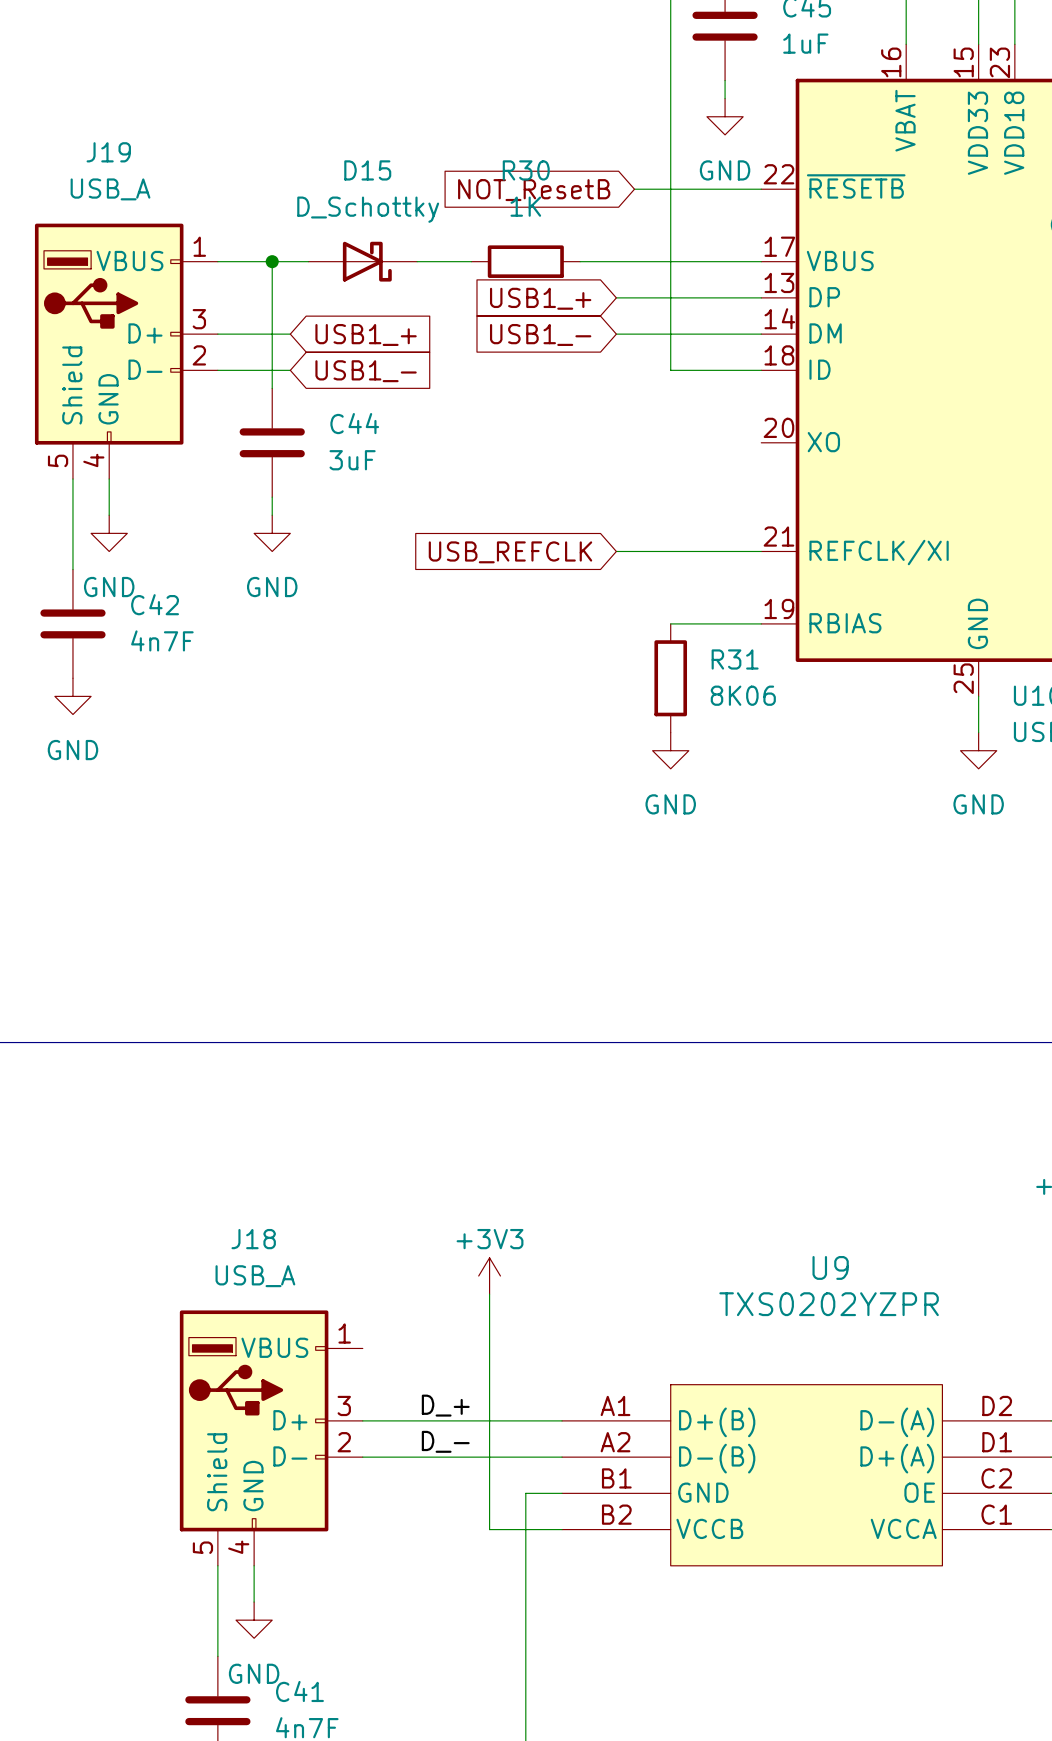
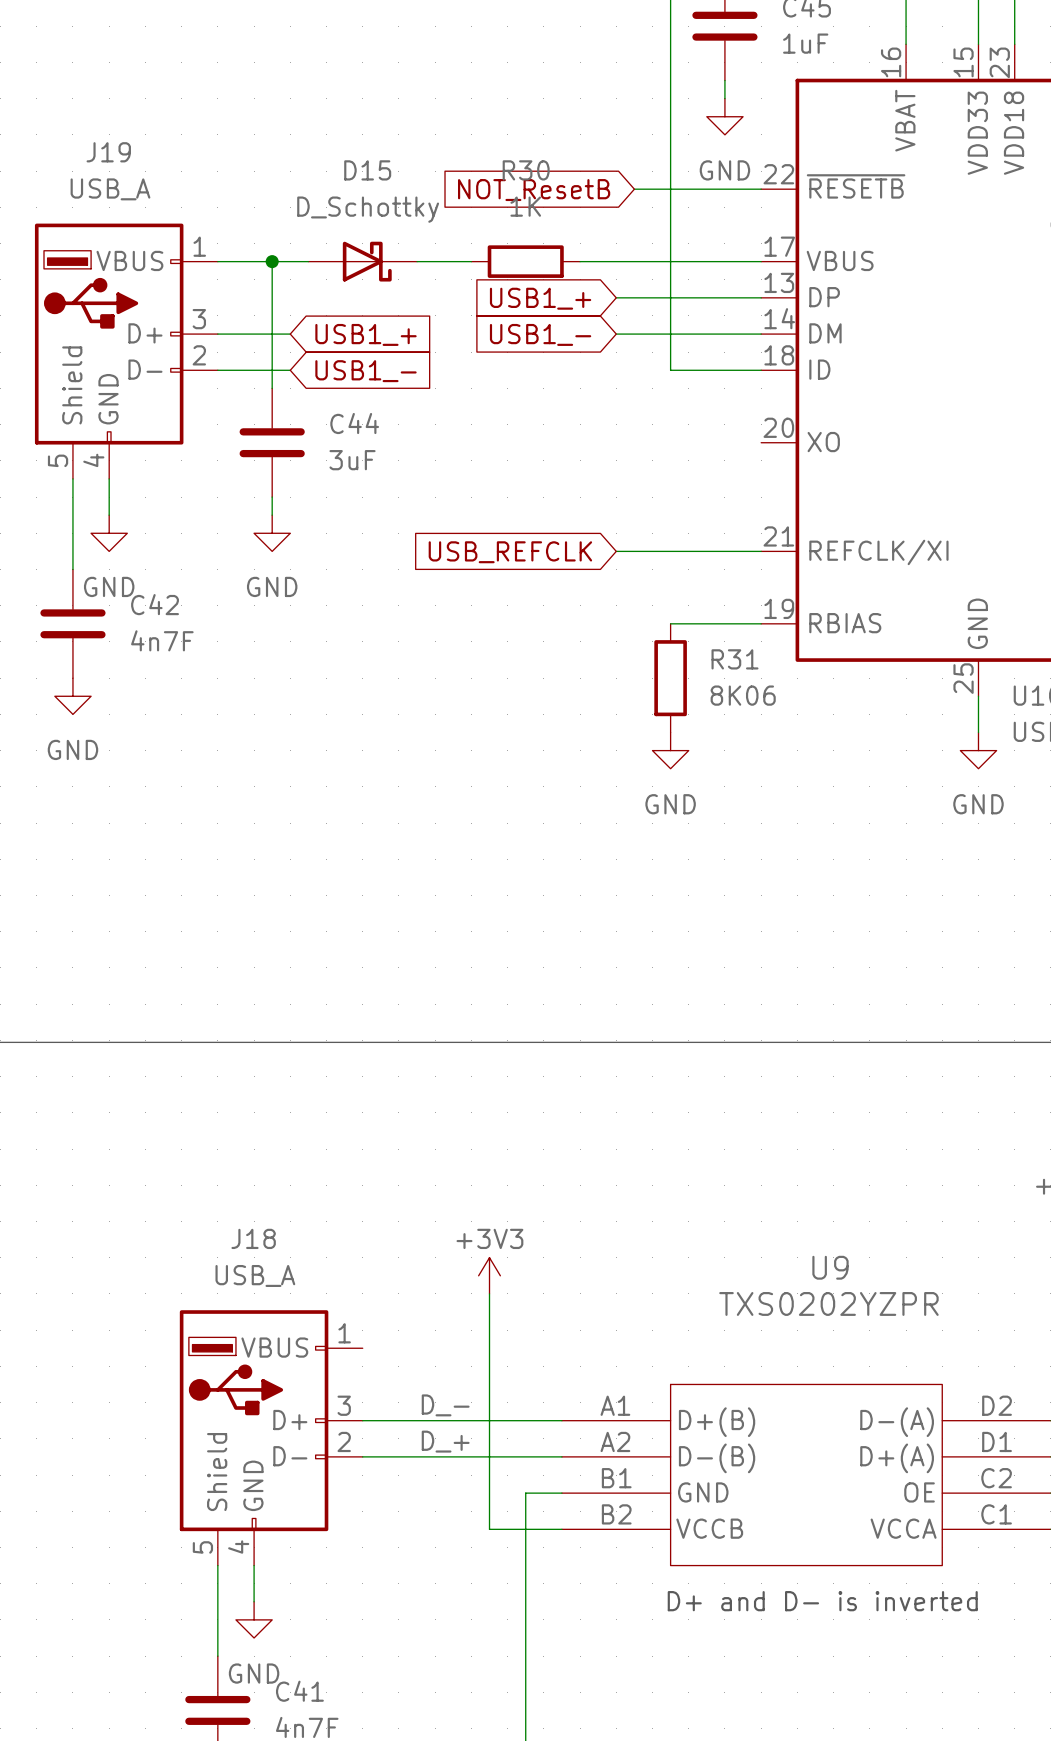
label: D_+ (445, 1405) -> D_- (445, 1405)
label: D_- (445, 1441) -> D_+ (445, 1441)
text: none -> D+ and D- is inverted (822, 1601)

